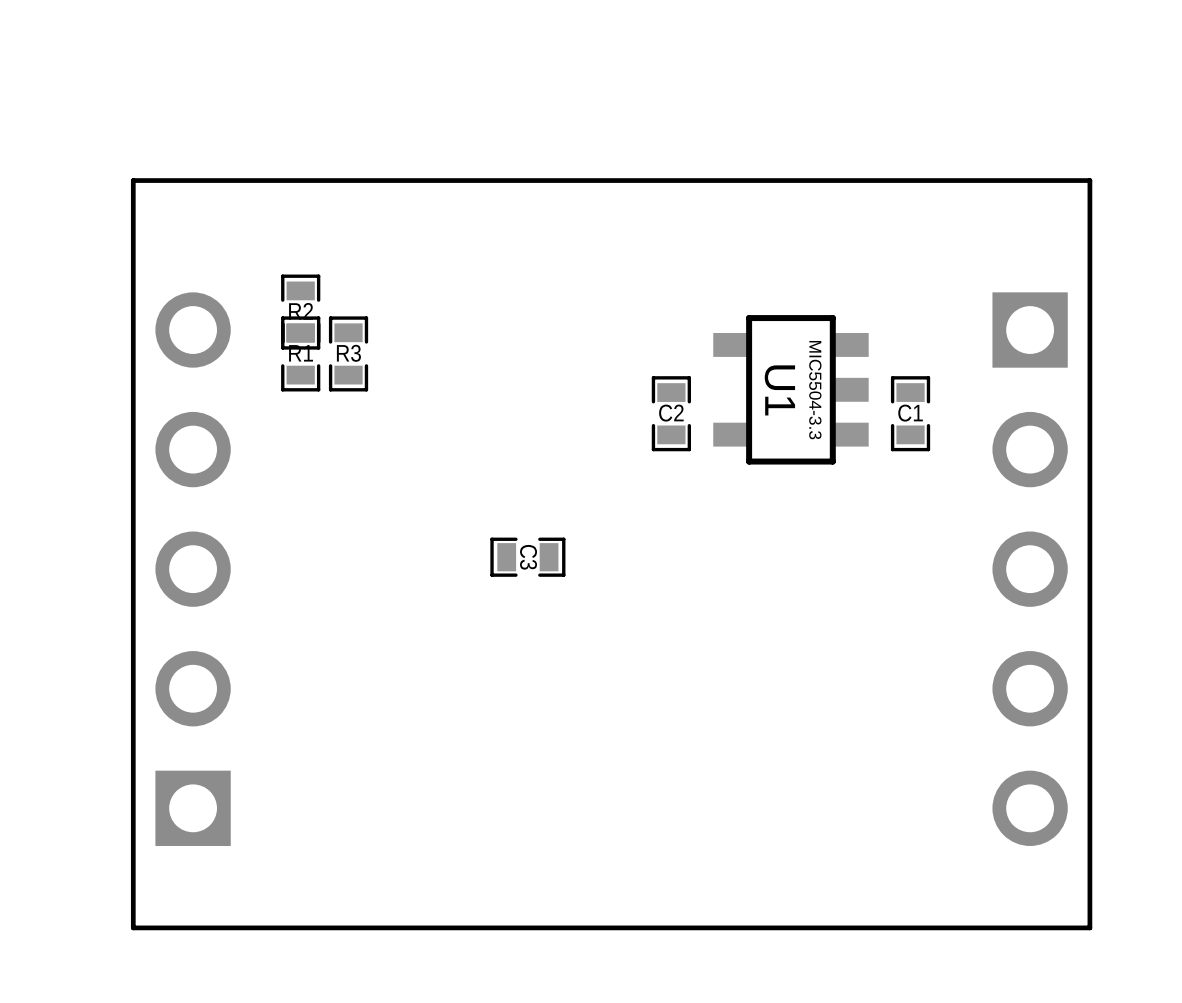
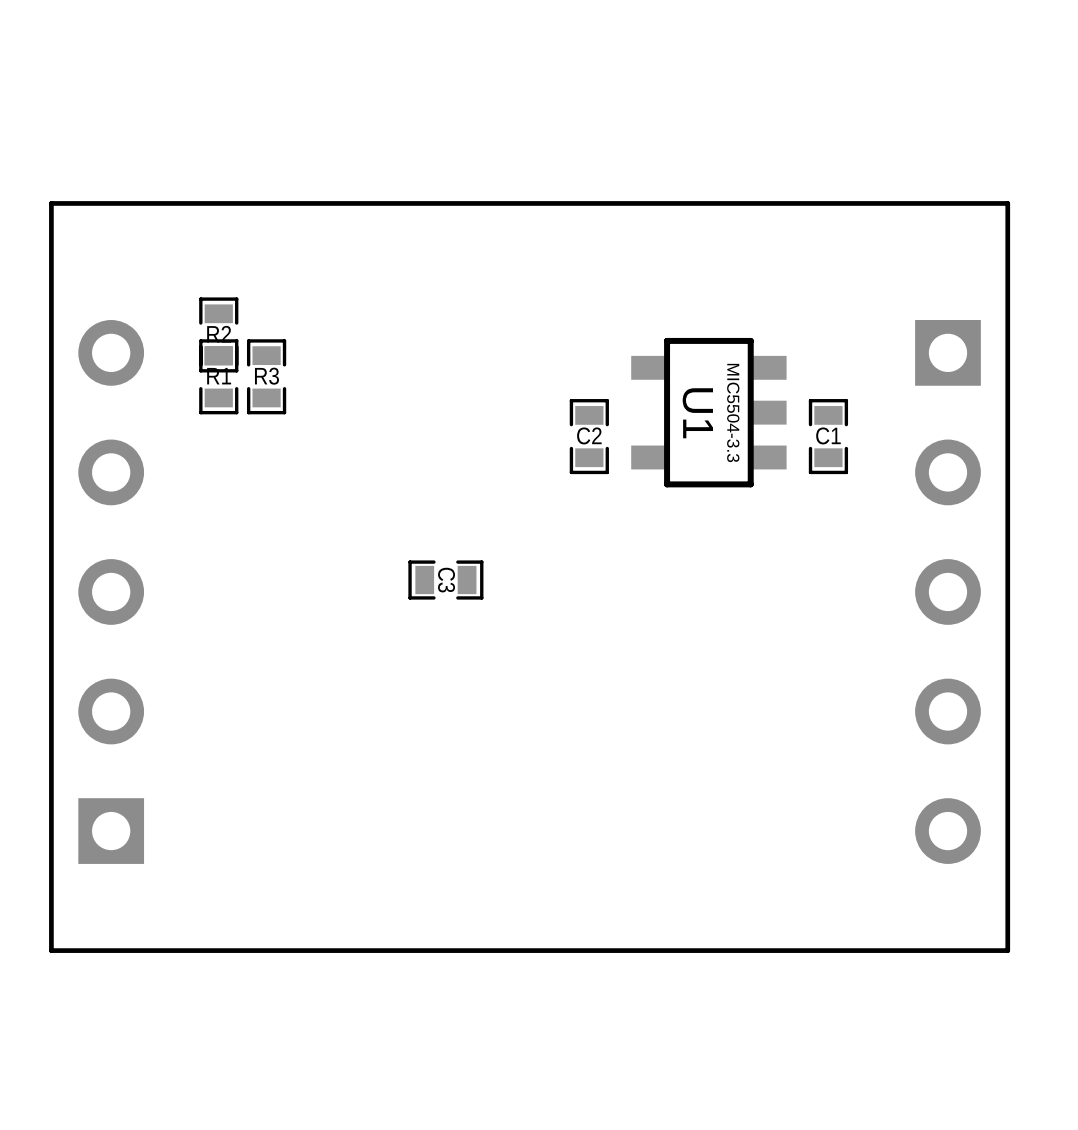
part footprint: [155, 292, 231, 846] -> [78, 320, 145, 864]
part footprint: [992, 292, 1068, 846] -> [915, 320, 981, 864]

